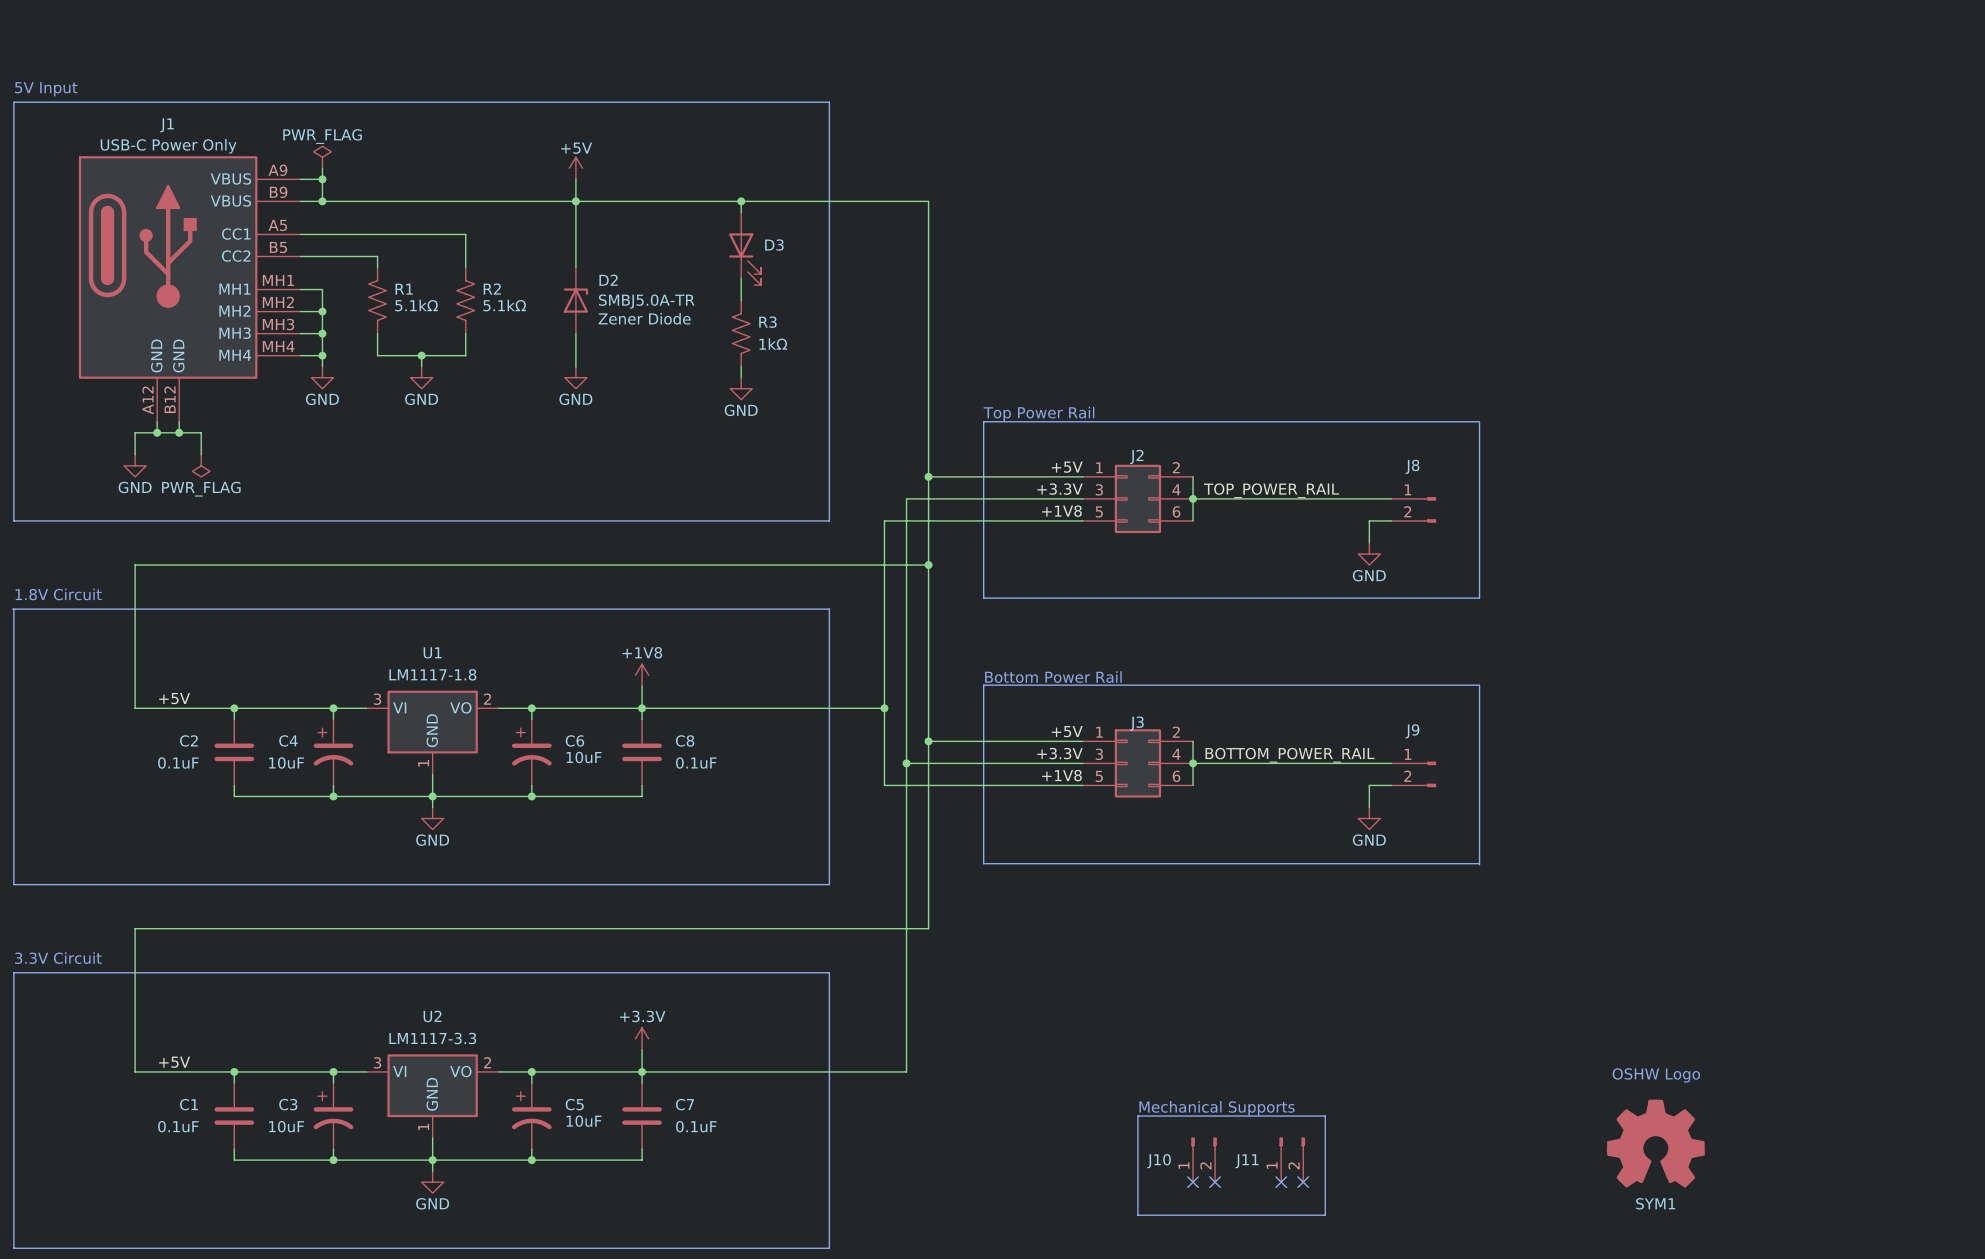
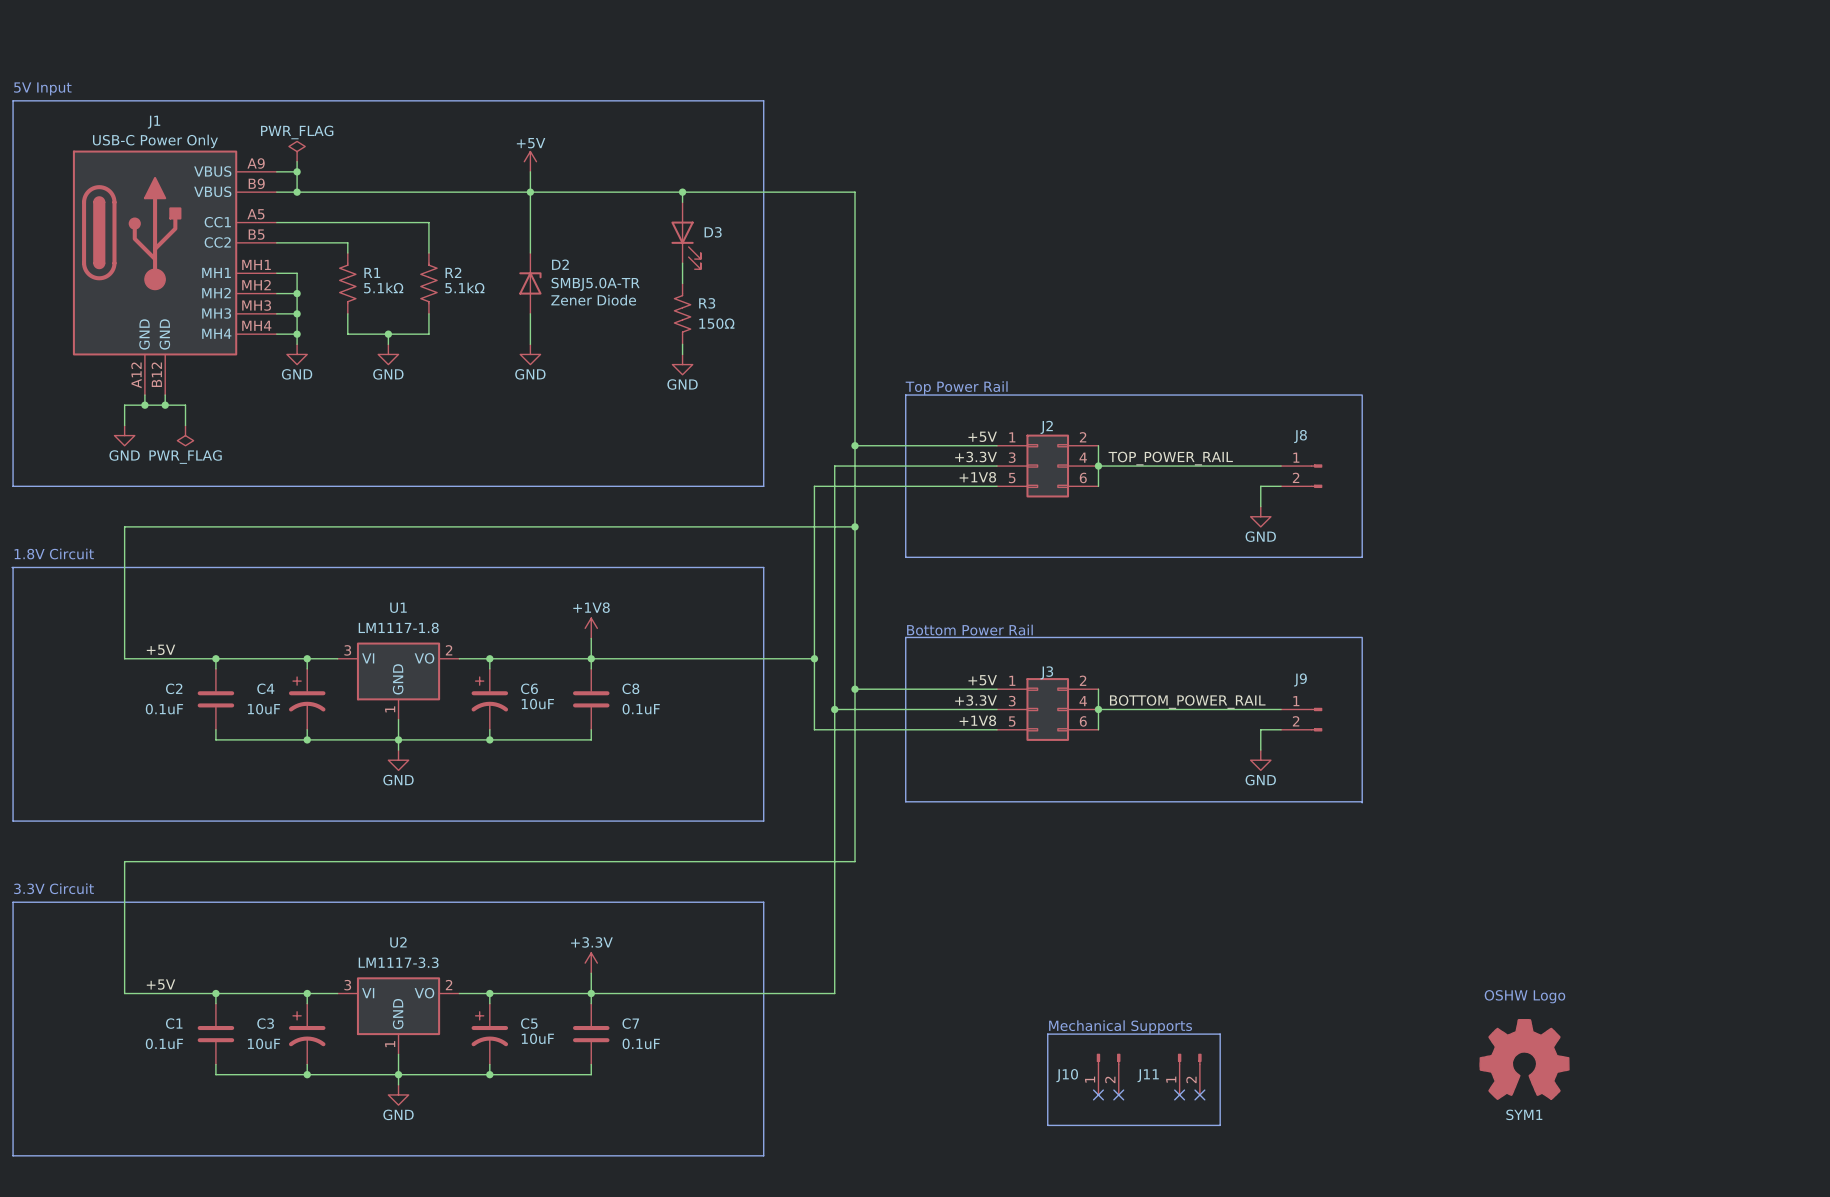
R3 value: 1kΩ (773, 344) -> 150Ω (716, 323)

